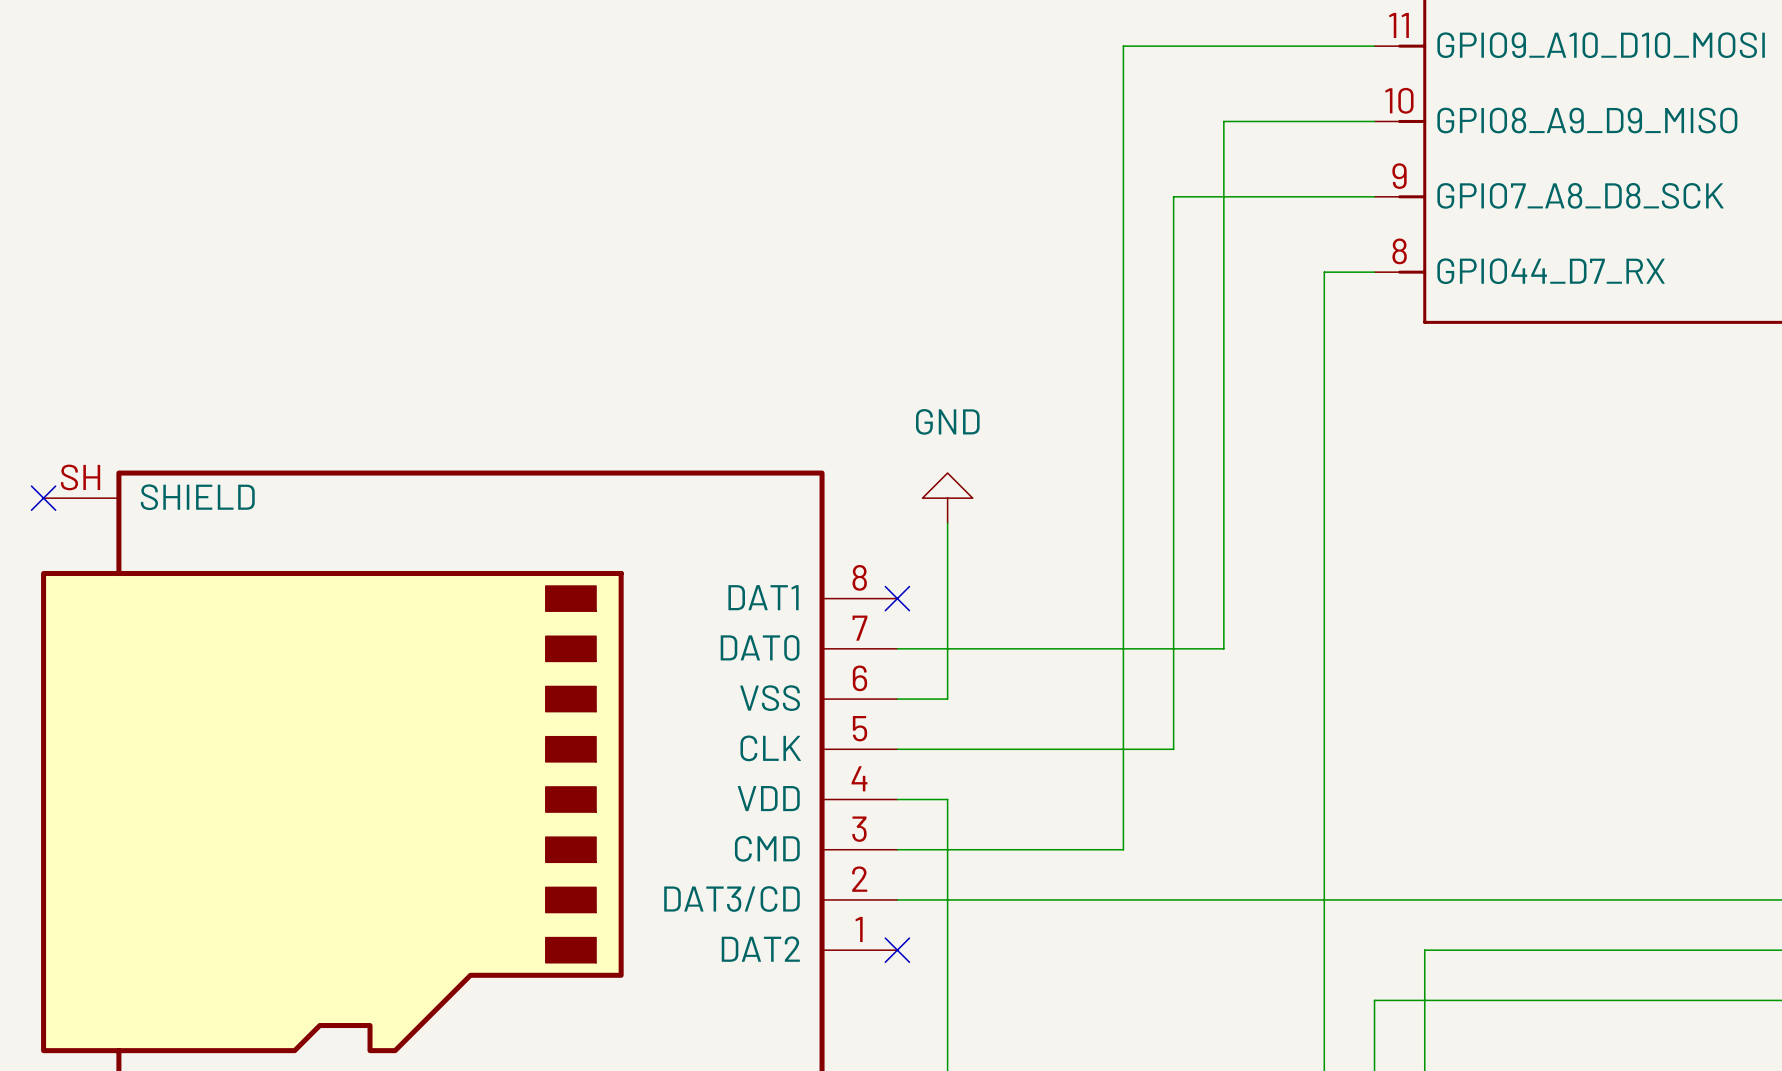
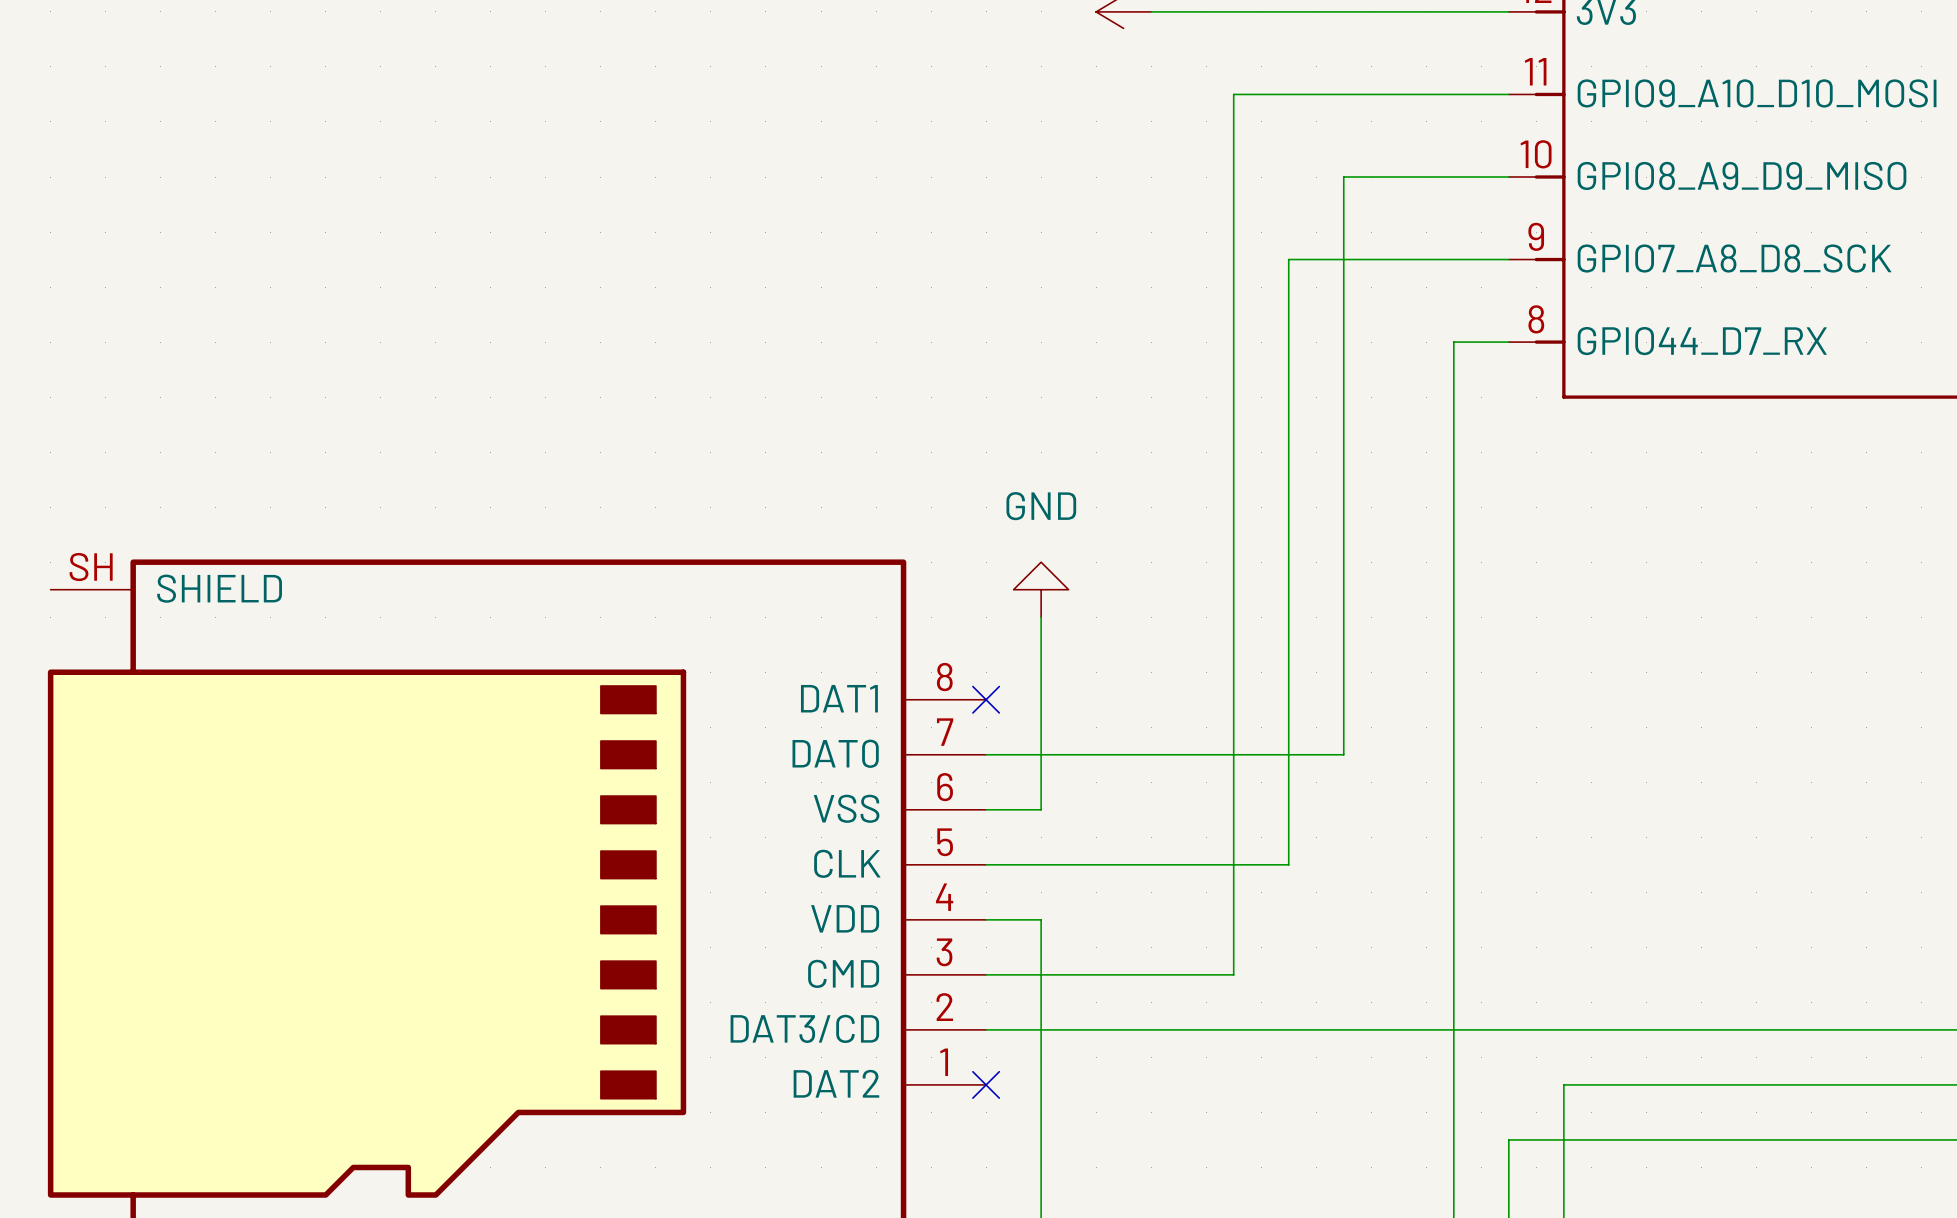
no-connect mark: (43, 498) -> none

